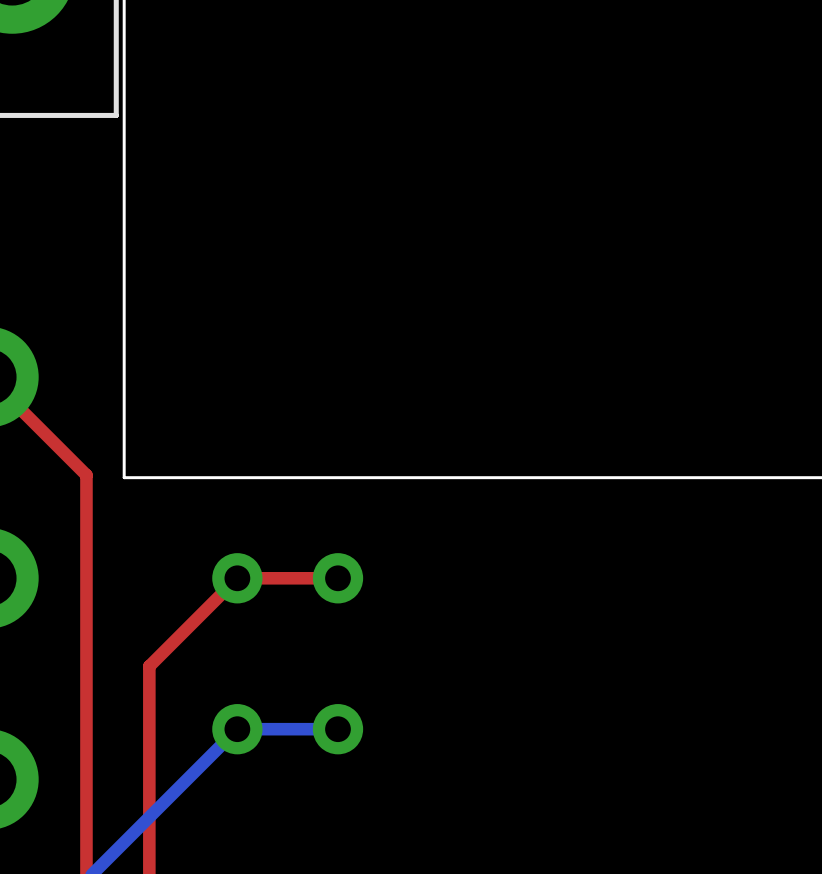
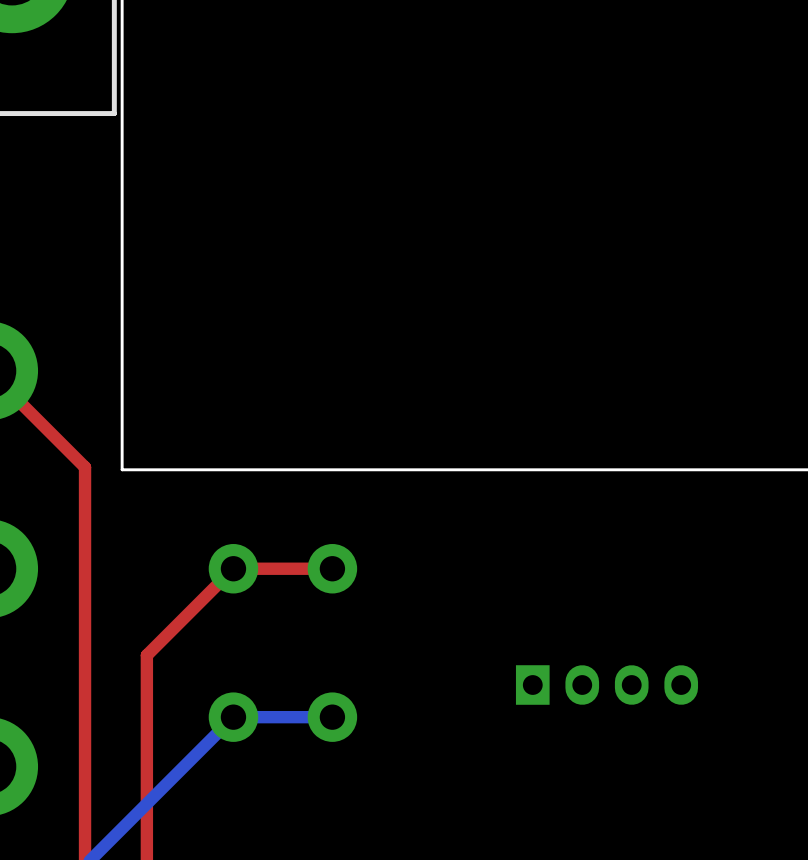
part: none -> (606, 685)

